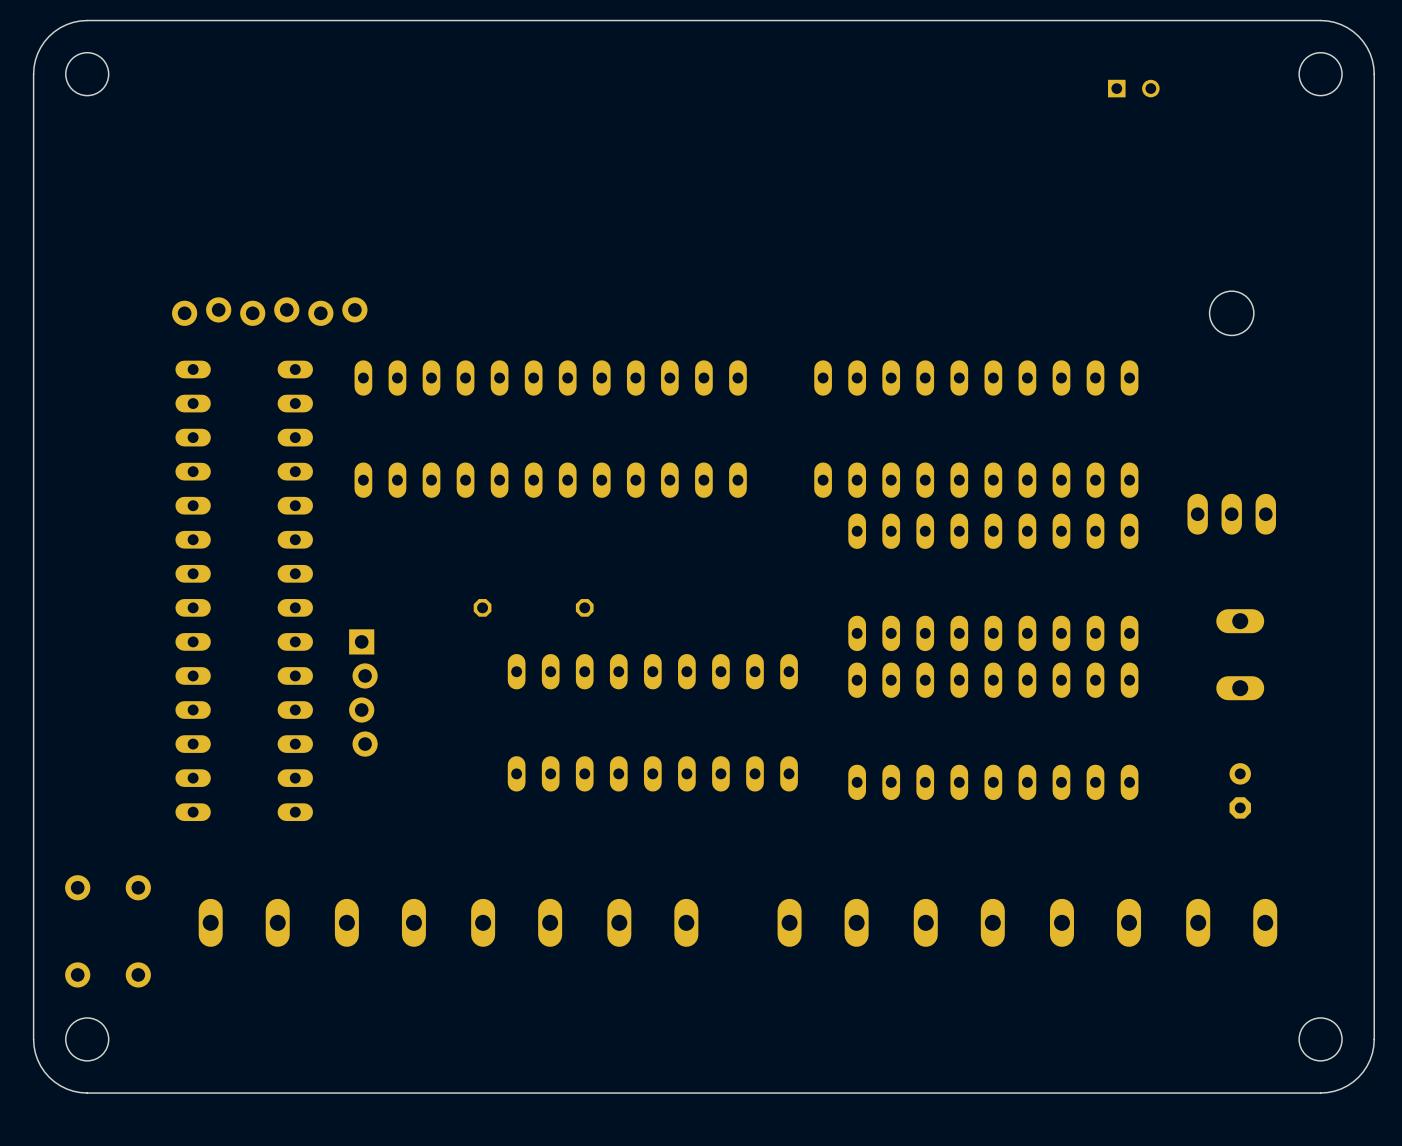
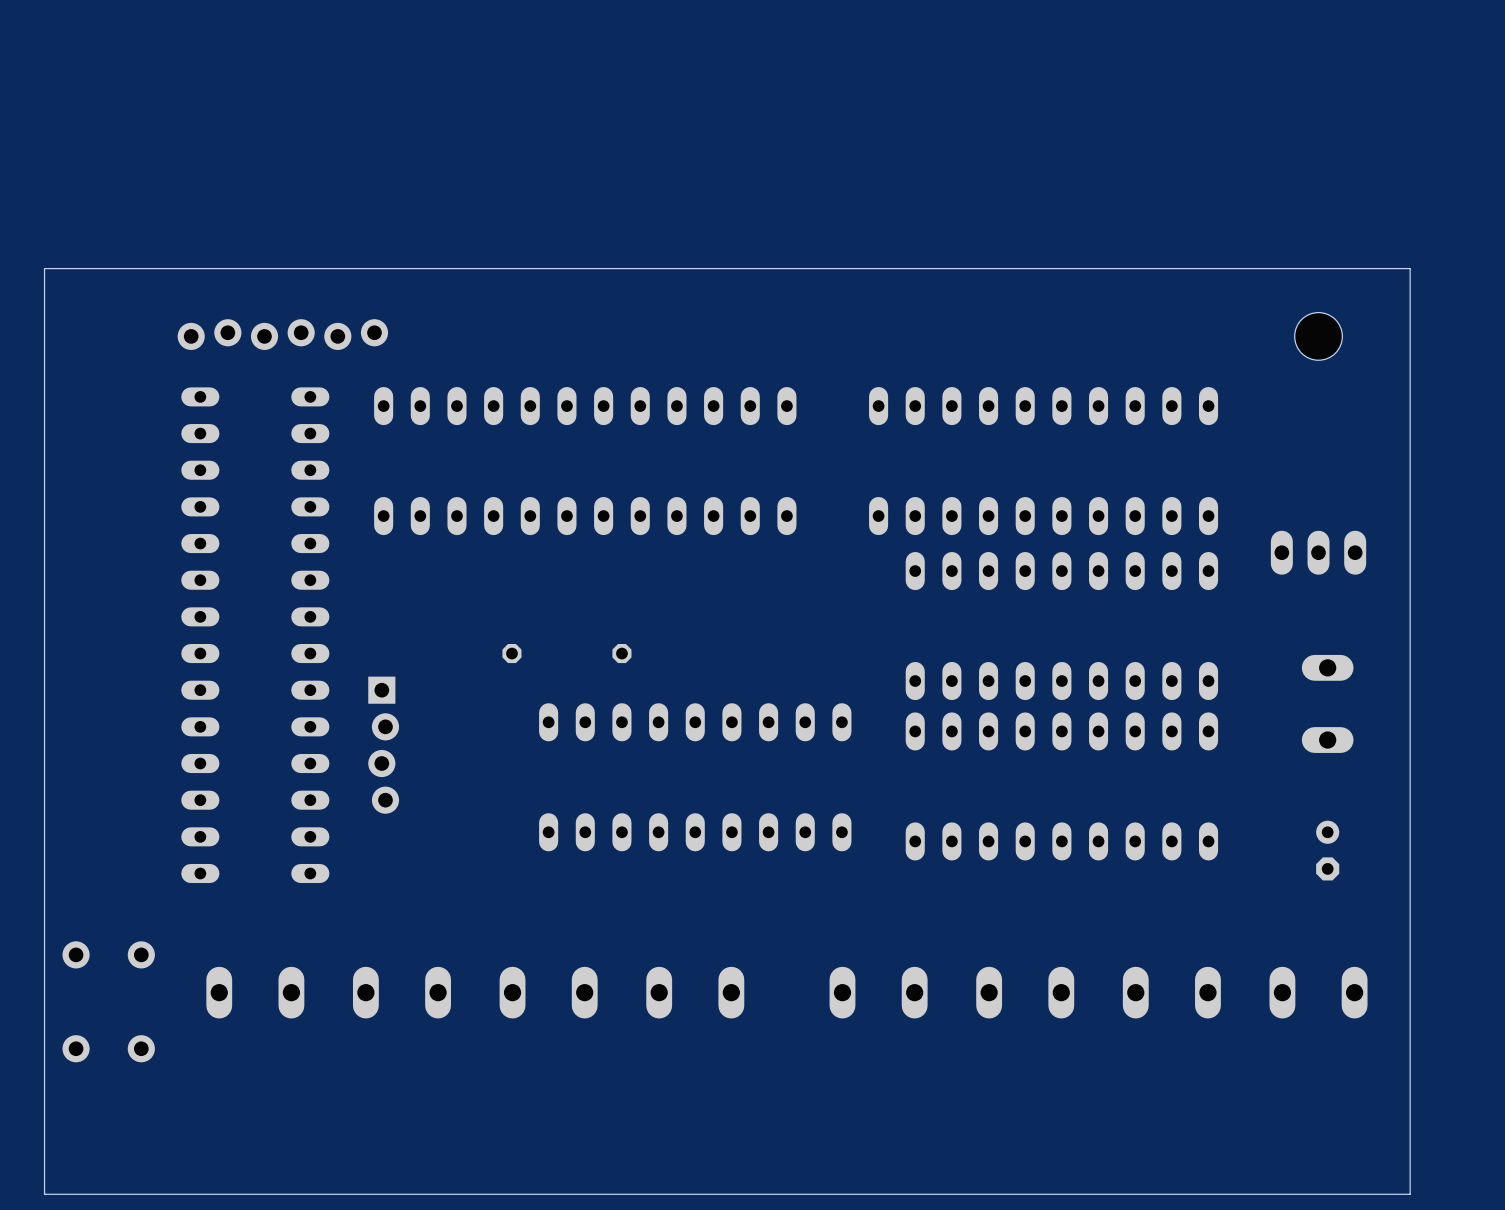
part: (1133, 88) -> none
board edge: none -> (1410, 268) (44, 268) (44, 1194) (1410, 1194) (1410, 268)
part: (703, 556) -> none

